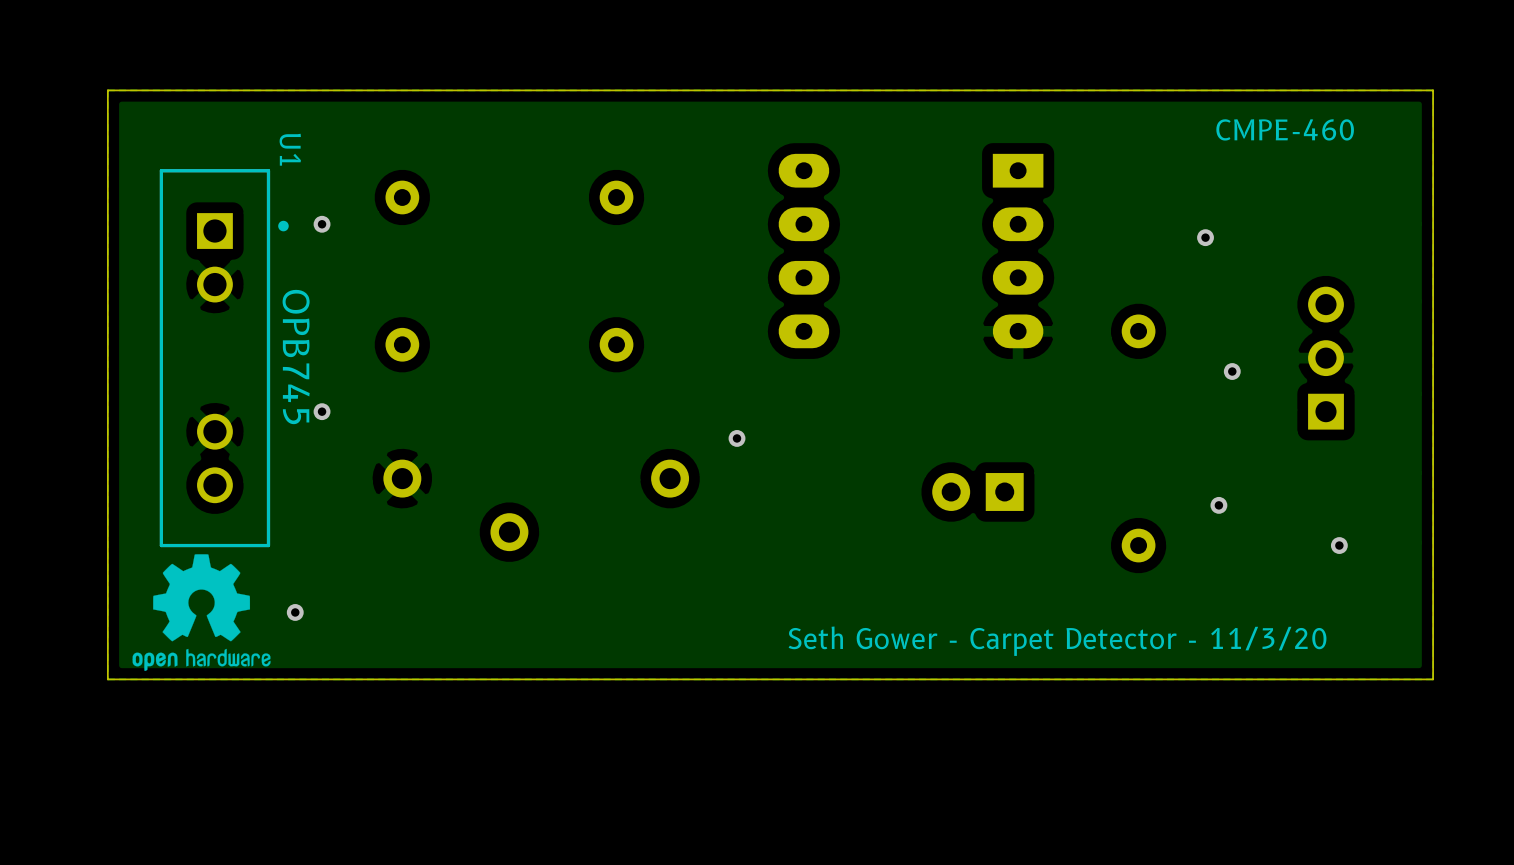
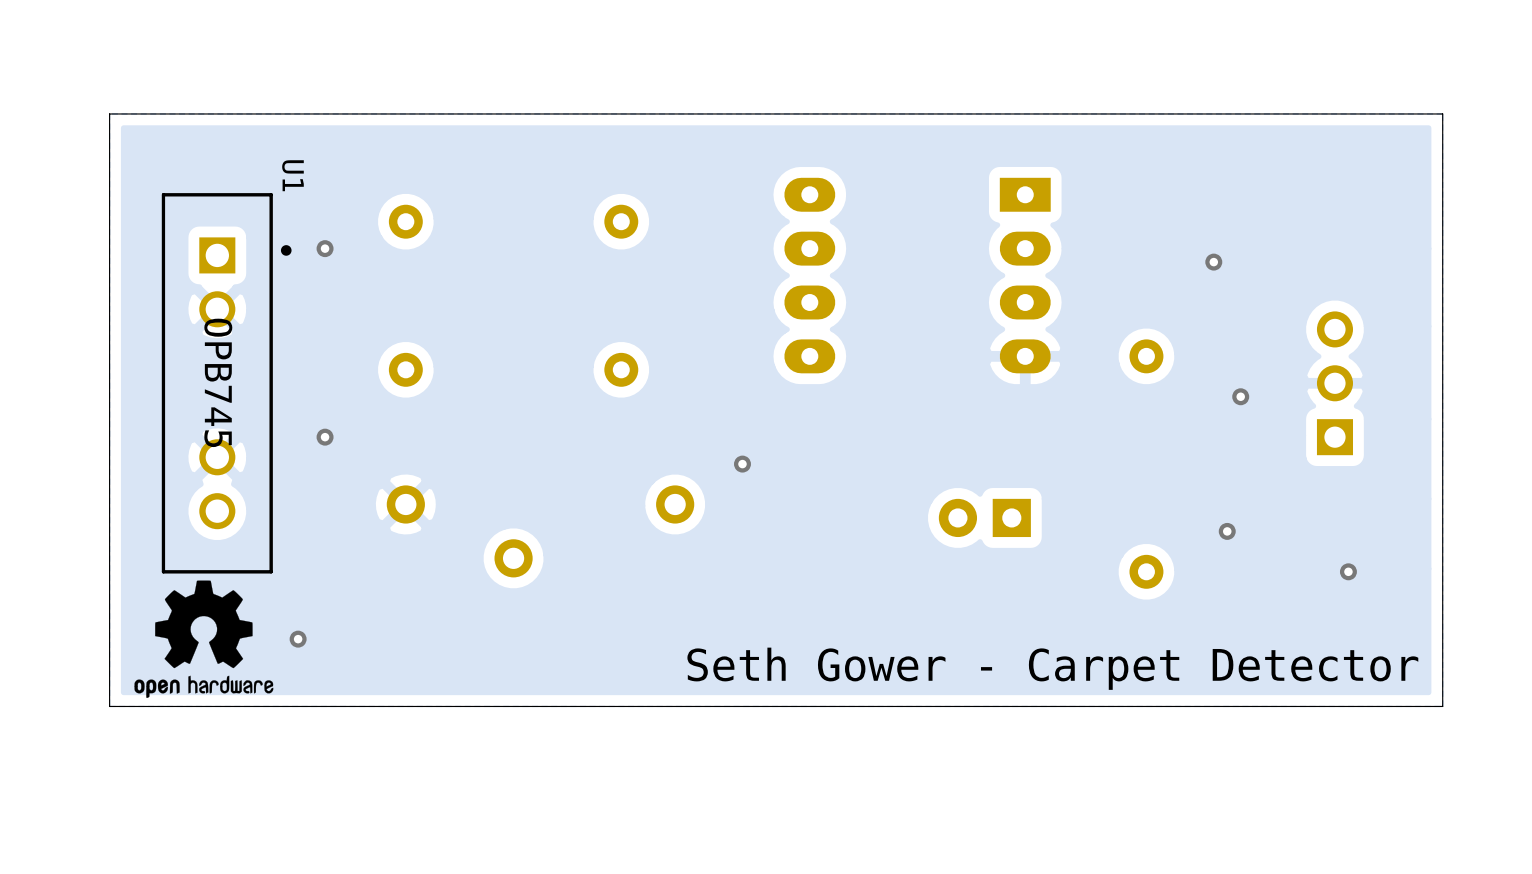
text: CMPE-460 (1285, 129) -> none
U1 value position: OPB745 (296, 357) -> OPB745 (218, 382)
text: Seth Gower - Carpet Detector - 11/3/20 (1057, 641) -> Seth Gower - Carpet Detector (1052, 668)

